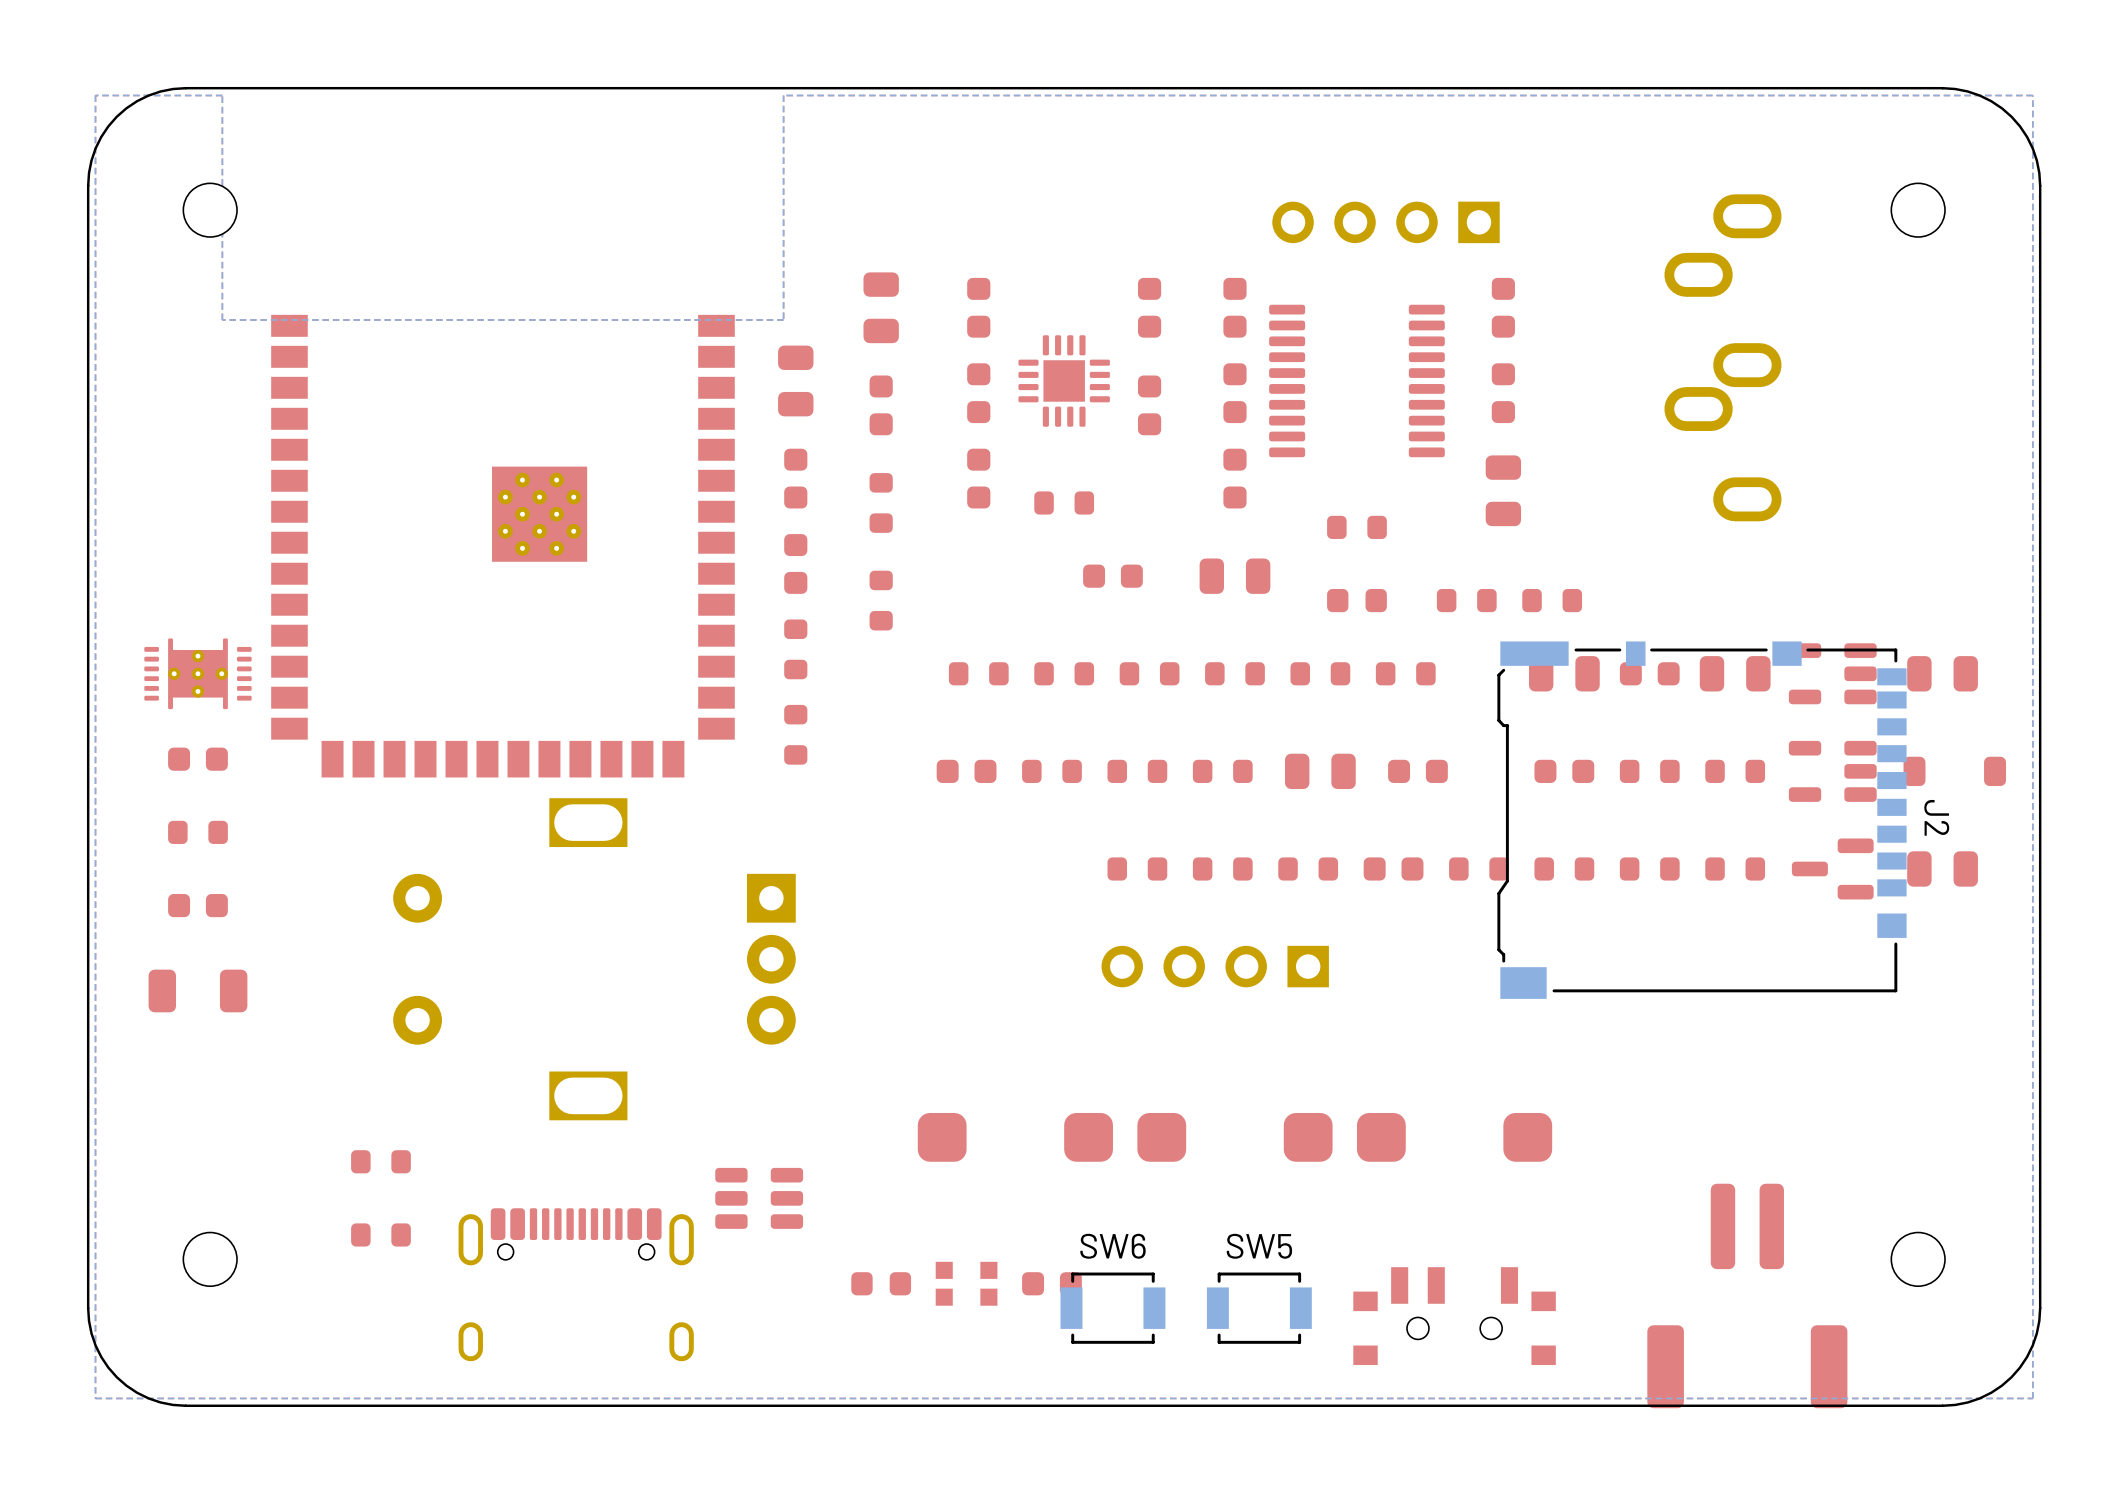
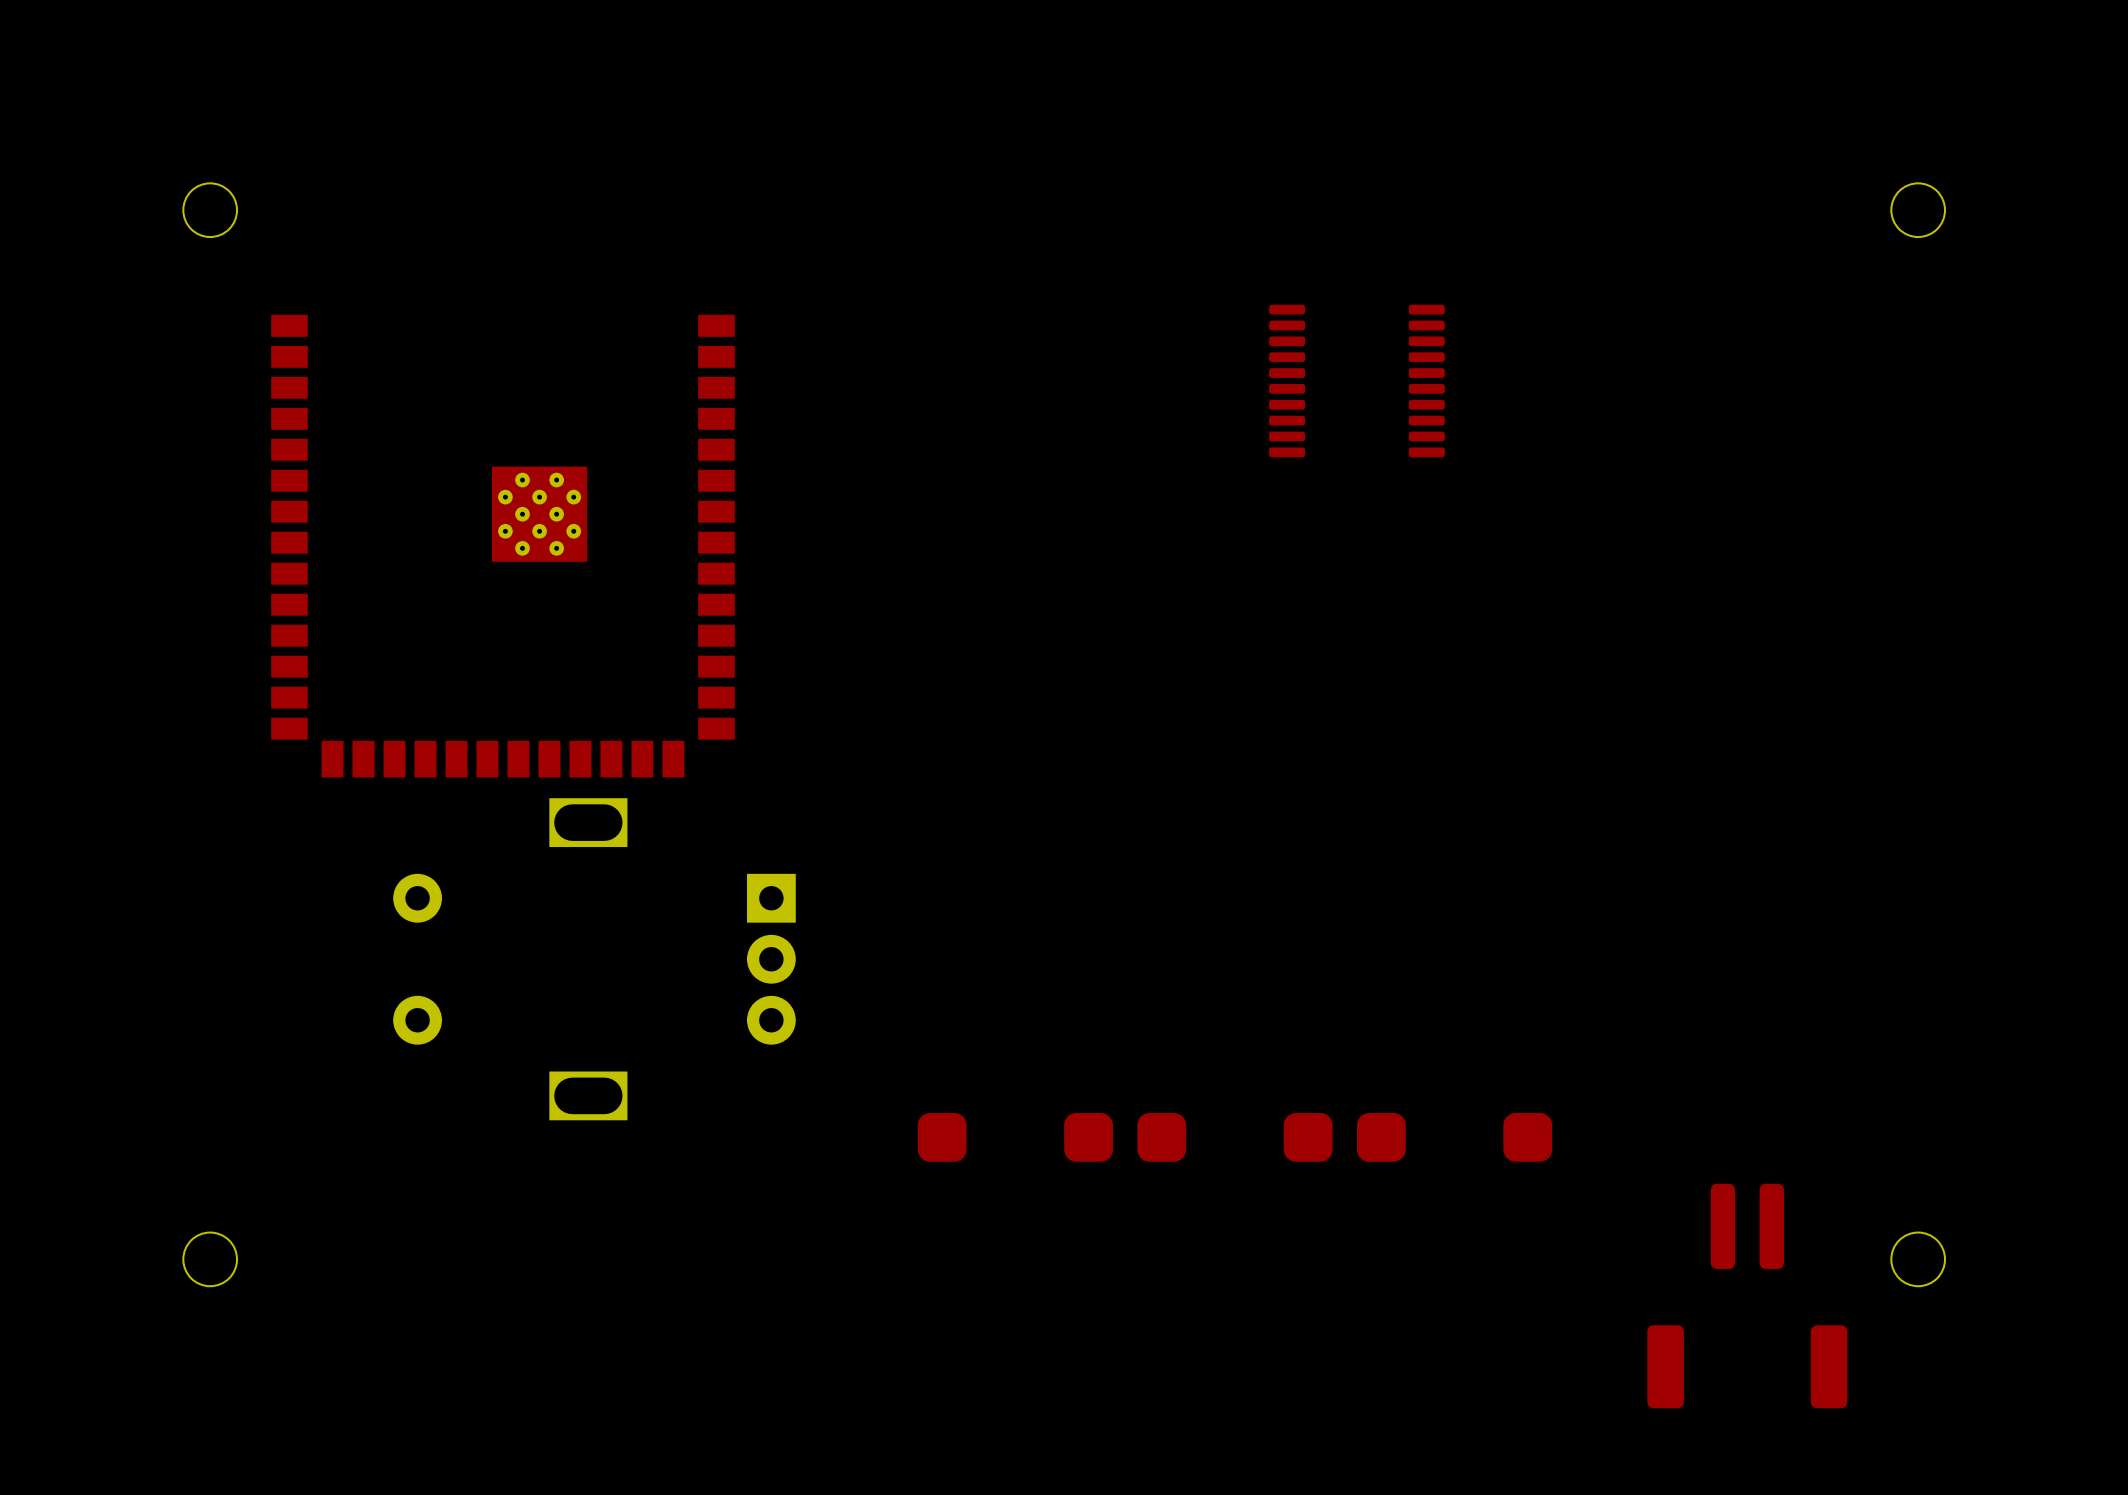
board edge: (1942, 88) (185, 88) (160, 91) (148, 95) (126, 108) (108, 126) (95, 148) (89, 173) (88, 185) (88, 1308) (91, 1333) (95, 1345) (108, 1367) (126, 1385) (148, 1398) (173, 1404) (185, 1405) (1942, 1405) (1955, 1404) (1979, 1398) (2001, 1385) (2020, 1367) (2032, 1345) (2039, 1320) (2040, 1308) (2040, 185) (2039, 173) (2032, 148) (2020, 126) (2011, 116) (1991, 101) (1979, 95) (1955, 89) (1942, 88) -> none
bottom zone outline: (2032, 95) (783, 95) (783, 319) (222, 319) (222, 95) (95, 95) (95, 1398) (2032, 1398) (2032, 95) -> none
part: (1386, 222) -> none
part: (881, 307) -> none
part: (978, 307) -> none
part: (1149, 307) -> none
part: (1234, 307) -> none
part: (1503, 307) -> none
part: (1722, 357) -> none
part: (795, 380) -> none
part: (1064, 380) -> none
part: (978, 393) -> none
part: (1234, 393) -> none
part: (1503, 393) -> none
part: (881, 405) -> none
part: (1149, 405) -> none
part: (795, 478) -> none
part: (978, 478) -> none
part: (1234, 478) -> none
part: (1503, 490) -> none
part: (881, 502) -> none
part: (1064, 502) -> none
part: (1356, 527) -> none
part: (795, 563) -> none
part: (1112, 576) -> none
part: (1234, 576) -> none
part: (881, 600) -> none
part: (1356, 600) -> none
part: (1466, 600) -> none
part: (1552, 600) -> none
part: (795, 649) -> none
part: (197, 673) -> none
part: (978, 673) -> none
part: (1064, 673) -> none
part: (1149, 673) -> none
part: (1234, 673) -> none
part: (1320, 673) -> none
part: (1405, 673) -> none
part: (1564, 673) -> none
part: (1649, 673) -> none
part: (1735, 673) -> none
part: (1832, 673) -> none
part: (1942, 673) -> none
part: (795, 734) -> none
part: (197, 759) -> none
part: (966, 771) -> none
part: (1051, 771) -> none
part: (1137, 771) -> none
part: (1222, 771) -> none
part: (1320, 771) -> none
part: (1417, 771) -> none
part: (1564, 771) -> none
part: (1649, 771) -> none
part: (1735, 771) -> none
part: (1832, 771) -> none
part: (1954, 771) -> none
J2: (1701, 820) -> none
part: (197, 832) -> none
part: (1137, 868) -> none
part: (1222, 868) -> none
part: (1308, 868) -> none
part: (1393, 868) -> none
part: (1478, 868) -> none
part: (1564, 868) -> none
part: (1649, 868) -> none
part: (1735, 868) -> none
part: (1832, 868) -> none
part: (1942, 868) -> none
part: (197, 905) -> none
part: (1215, 966) -> none
part: (197, 990) -> none
part: (380, 1161) -> none
part: (759, 1198) -> none
part: (380, 1234) -> none
part: (881, 1283) -> none
part: (966, 1283) -> none
part: (1051, 1283) -> none
part: (576, 1284) -> none
SW6: (1112, 1308) -> none
SW5: (1259, 1308) -> none
part: (1454, 1316) -> none

